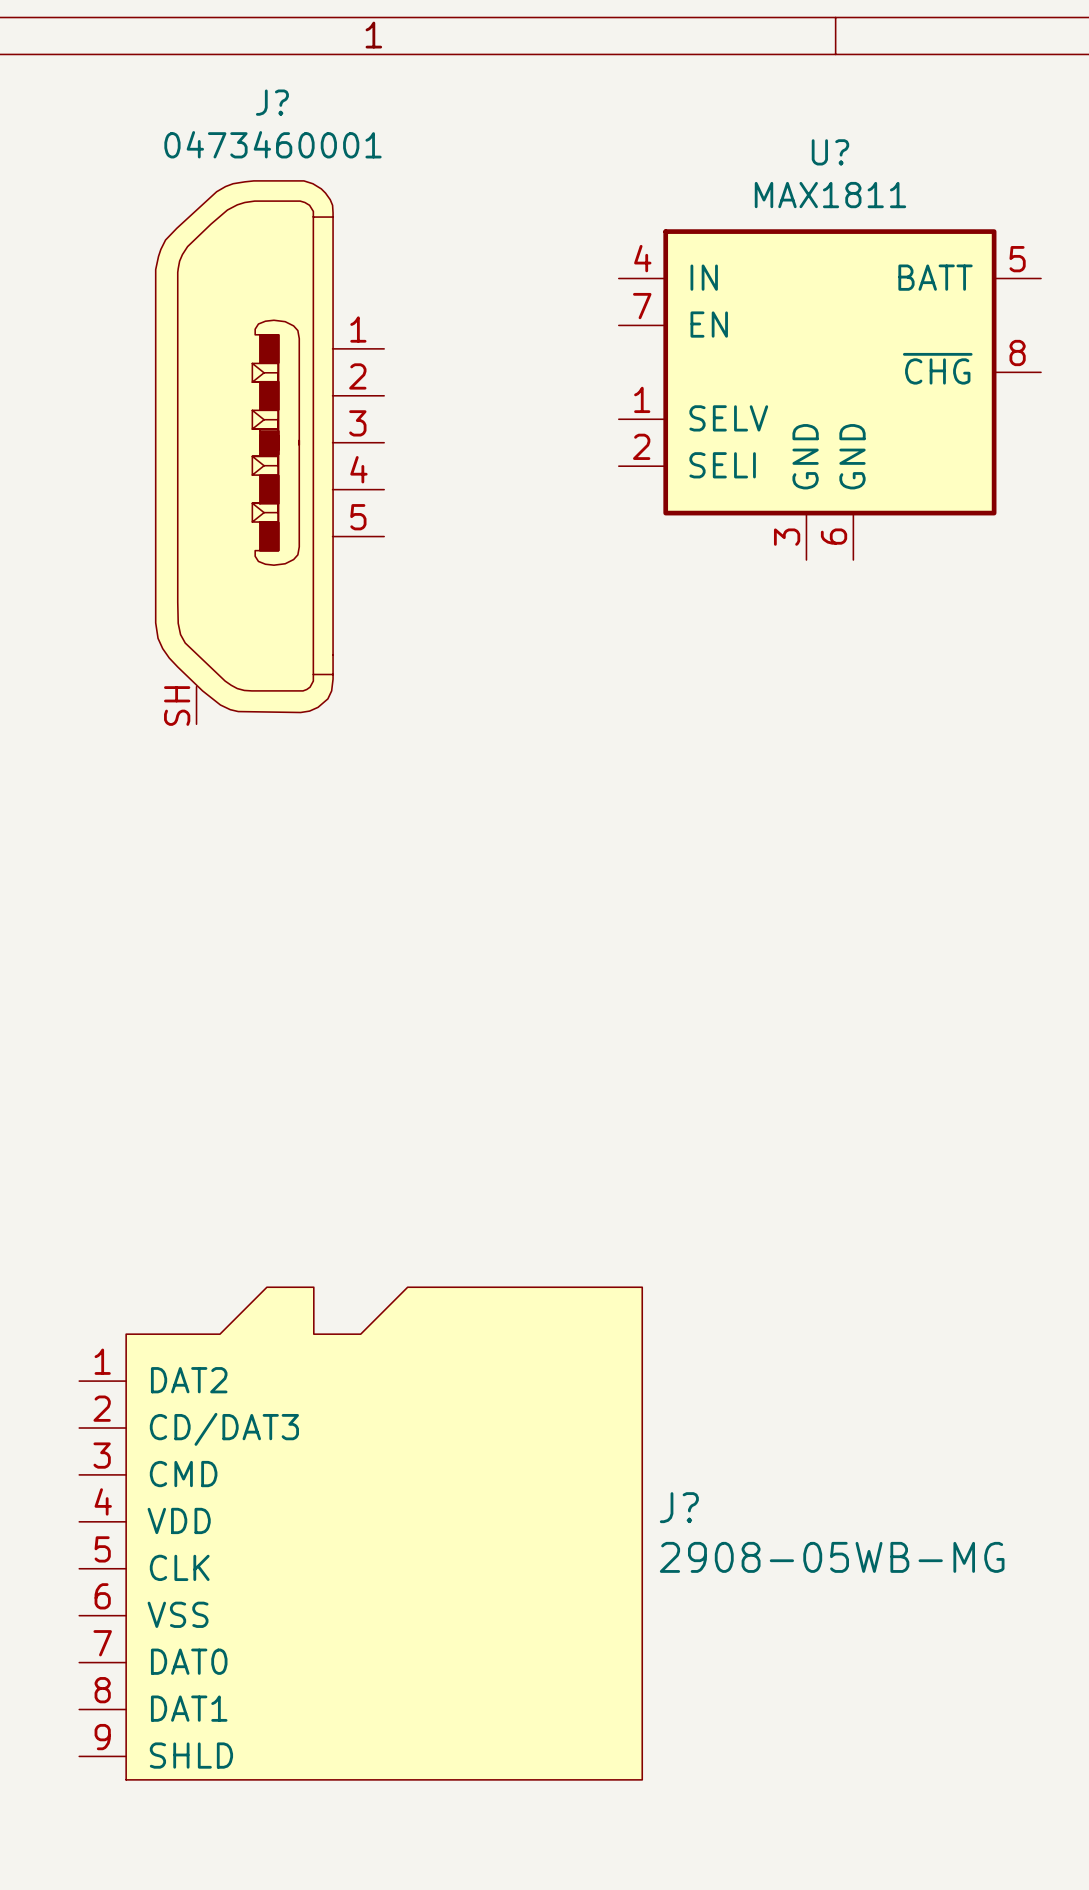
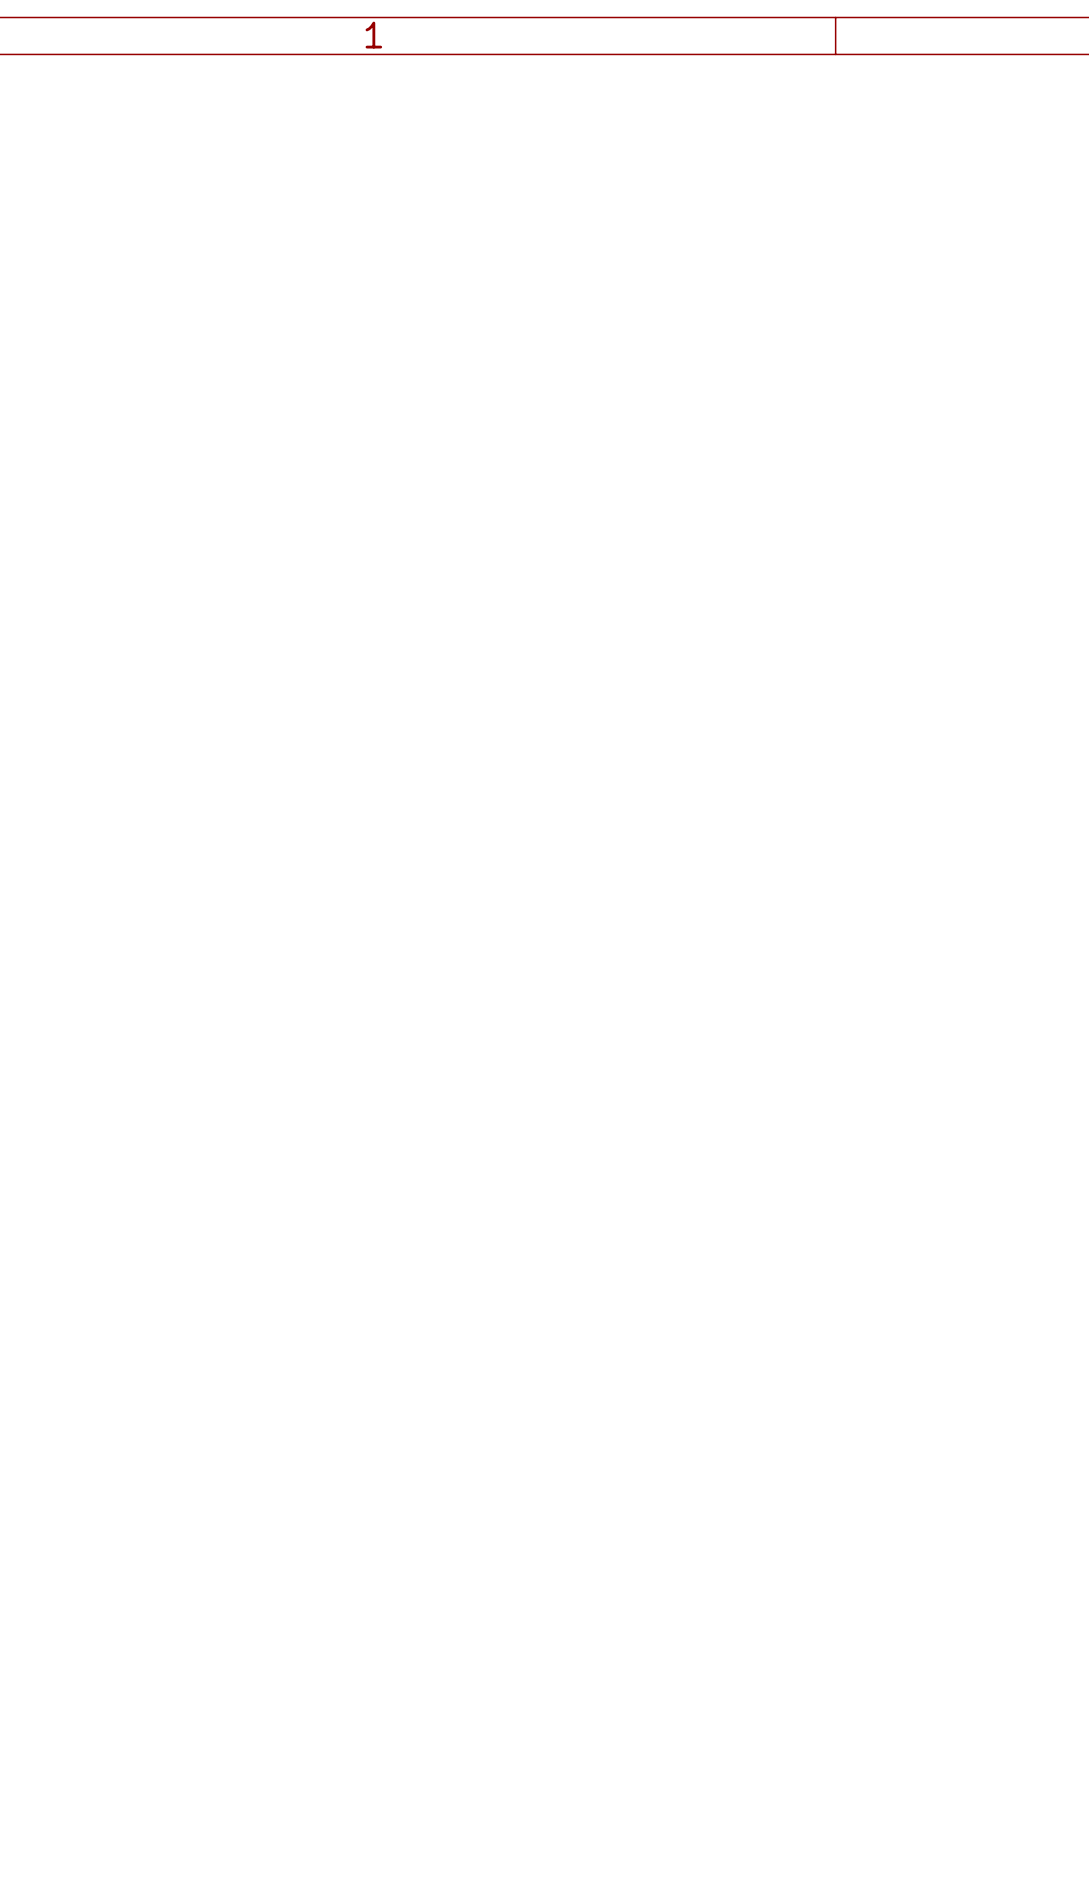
U?: MAX1811 (829, 394) -> none
J?: 0473460001 (269, 452) -> none
J?: 2908-05WB-MG (360, 1533) -> none

